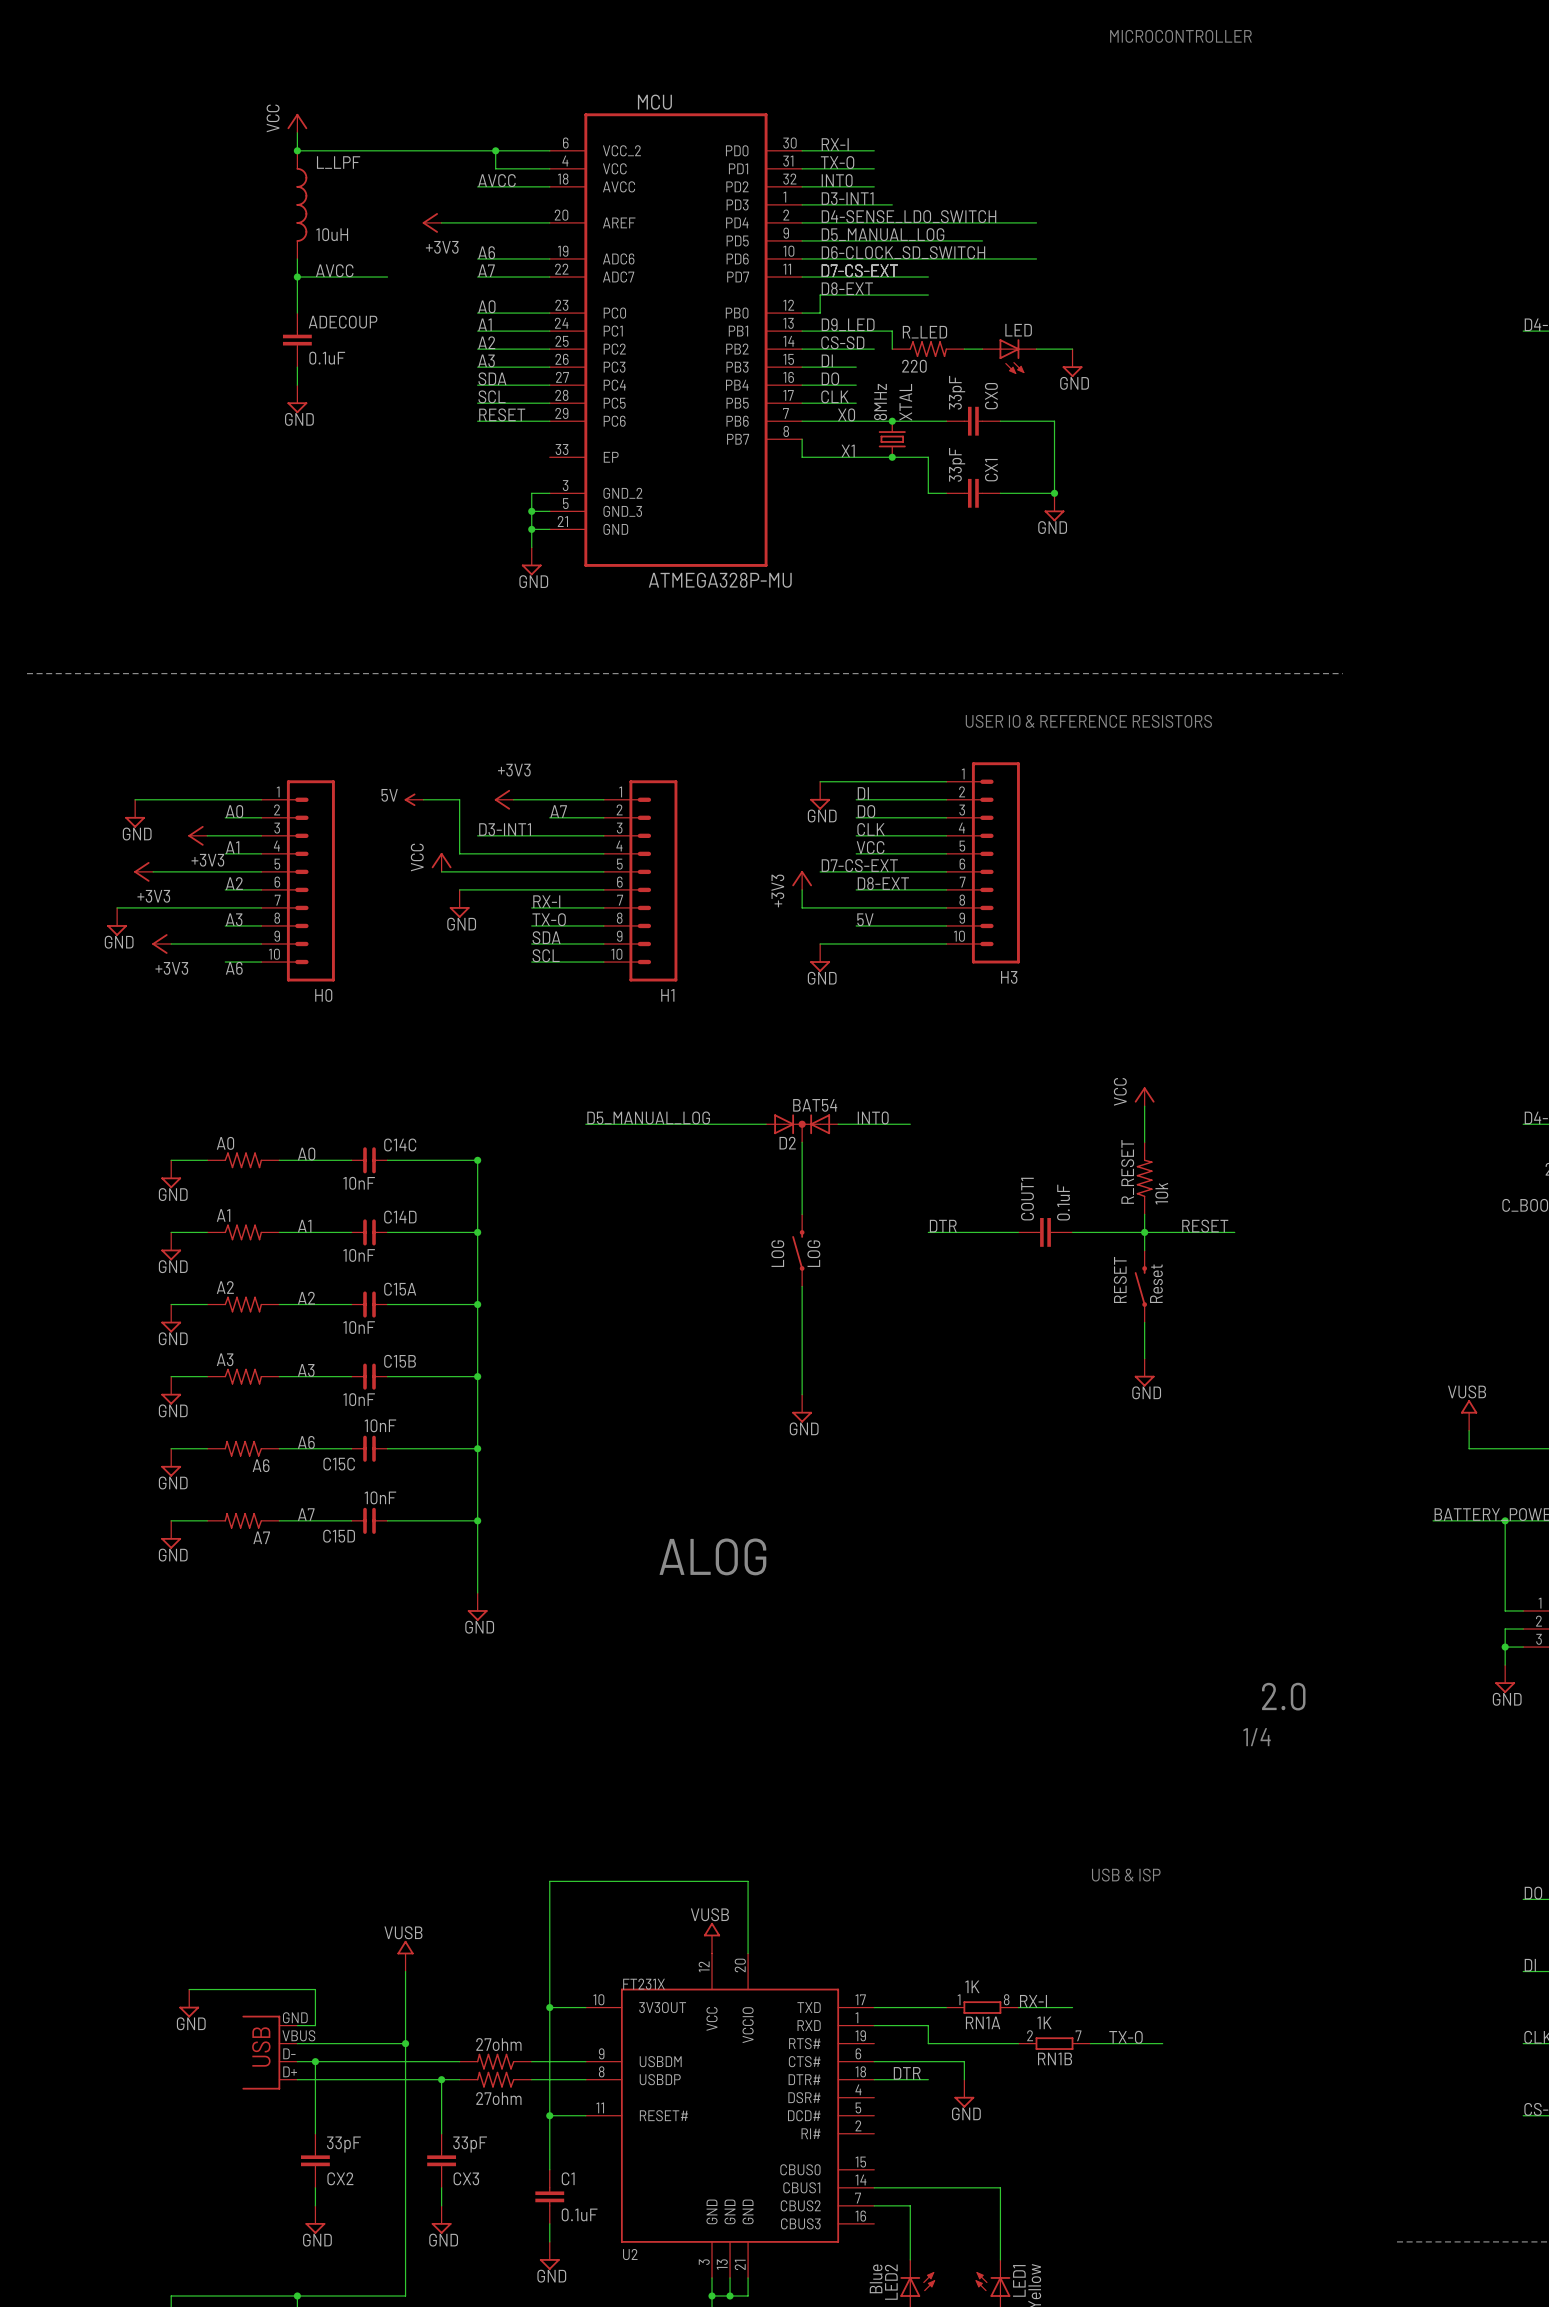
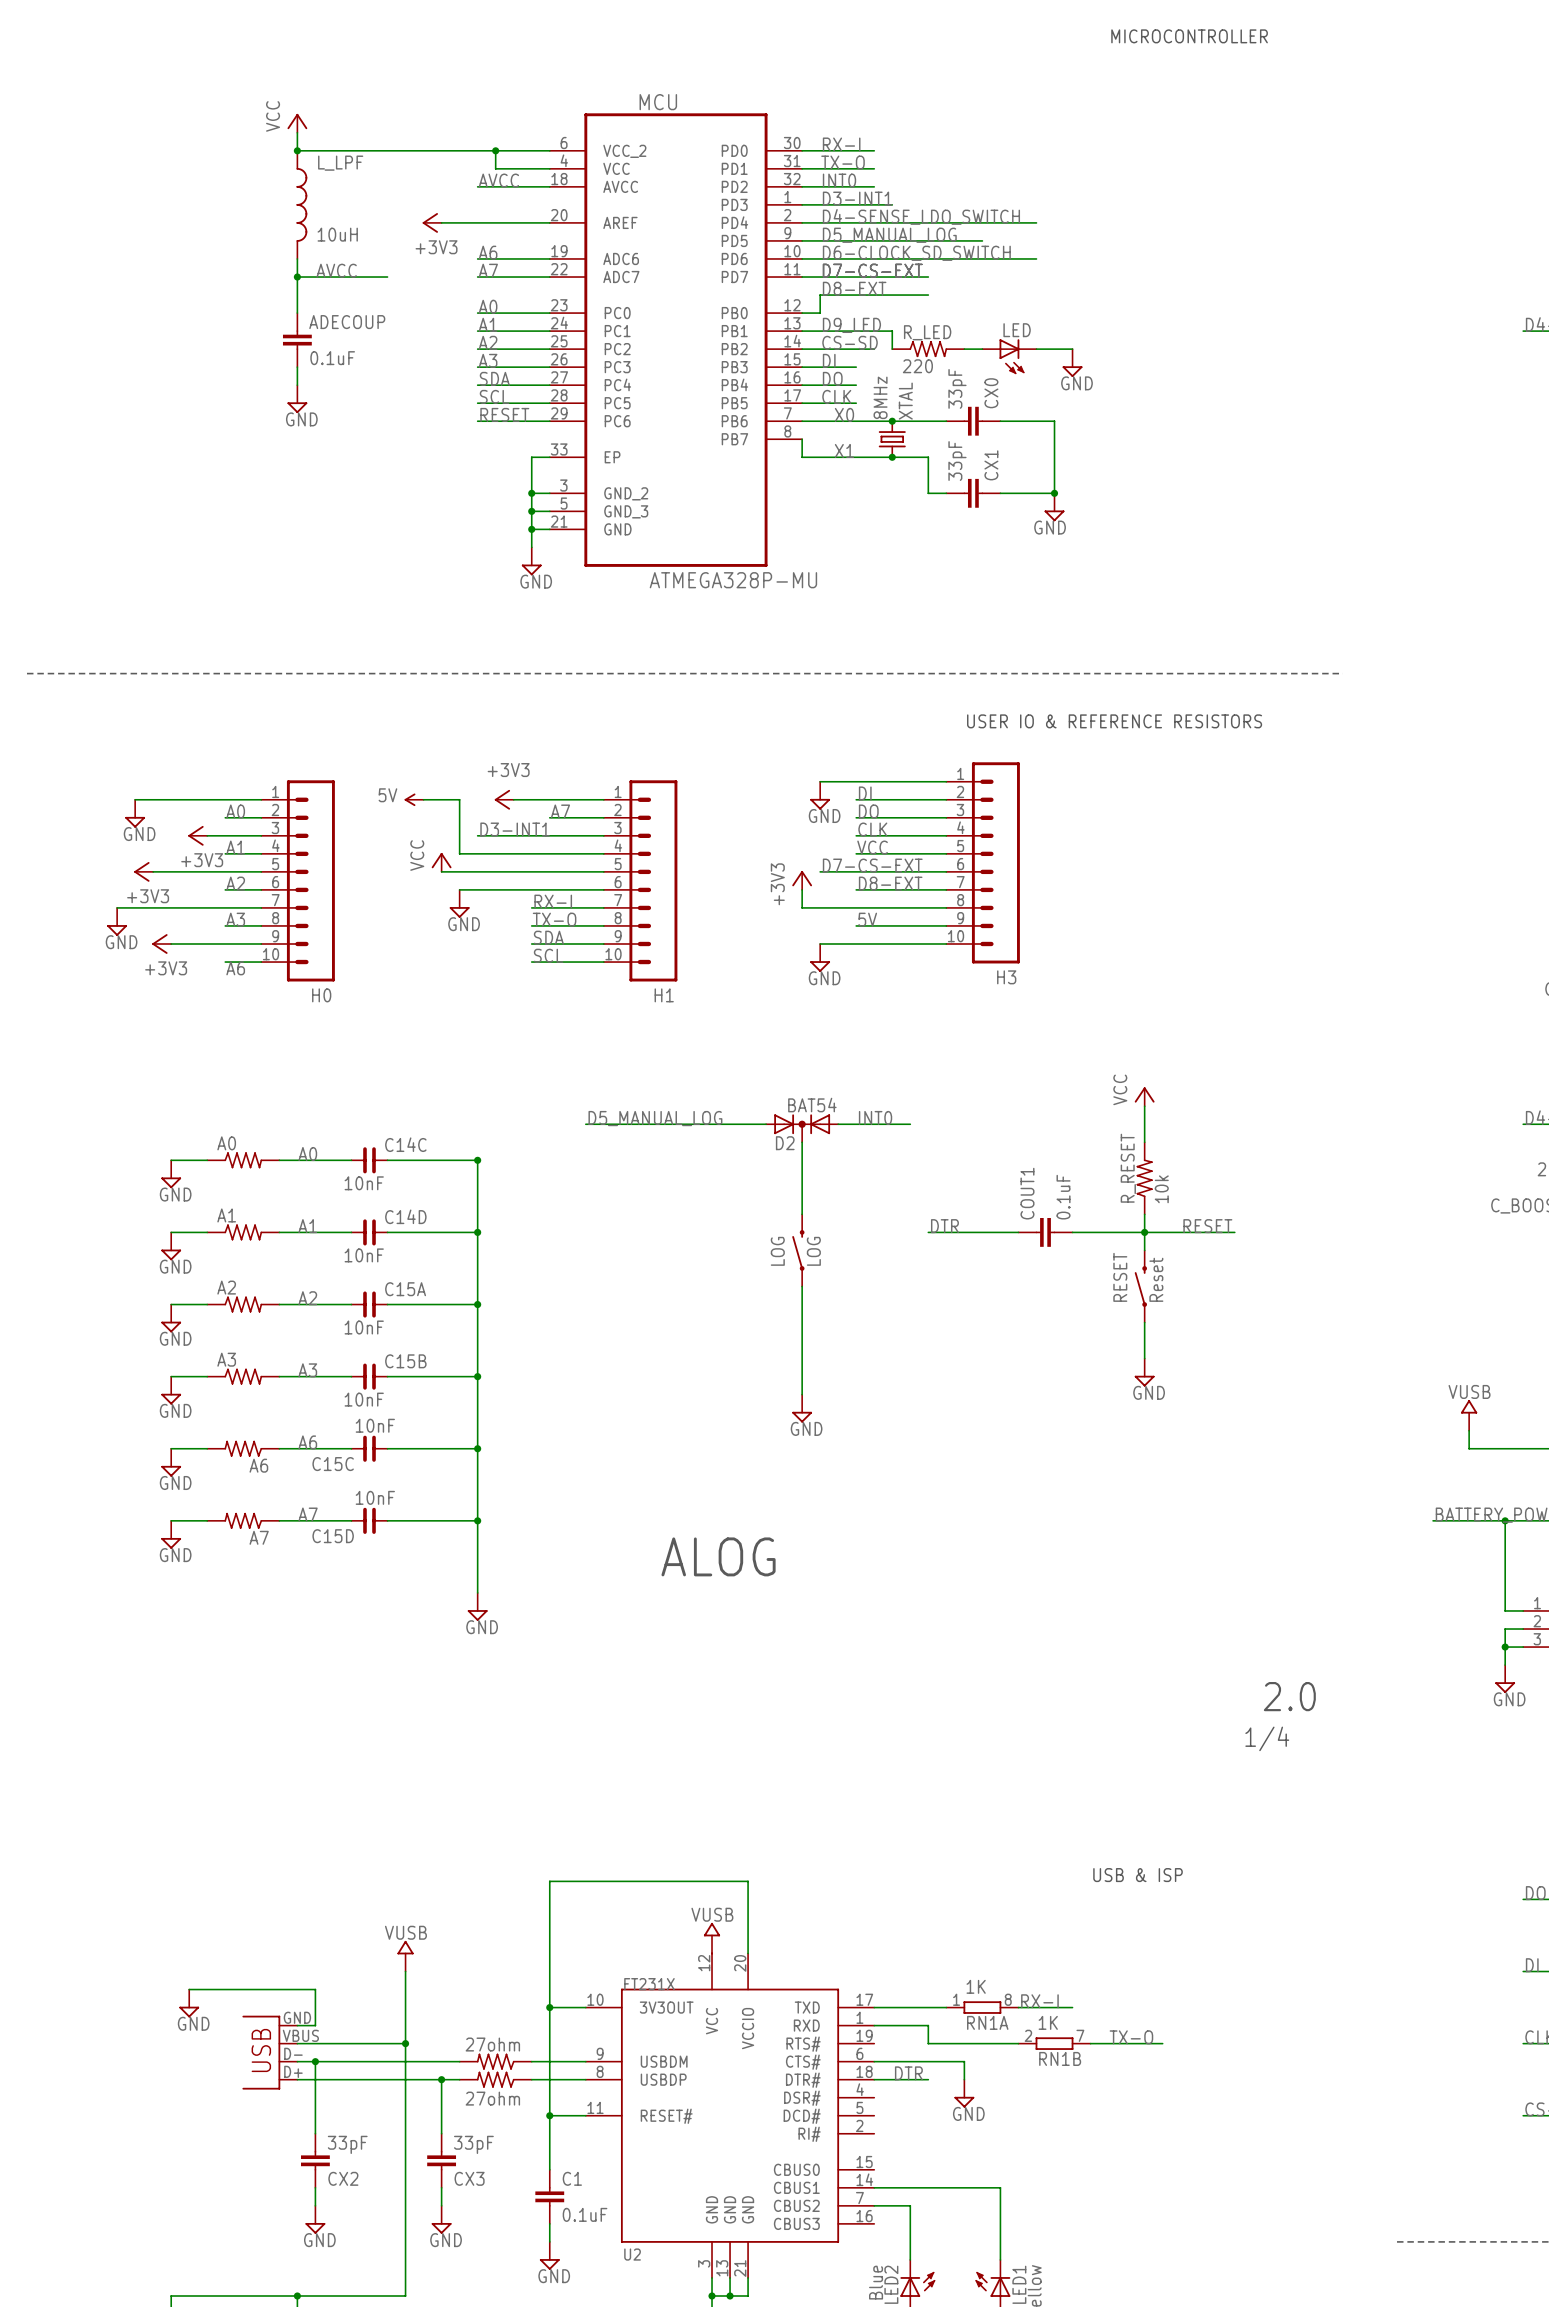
wire: none -> (549, 457) (531, 457) (531, 493)
junction: none -> (531, 493)

